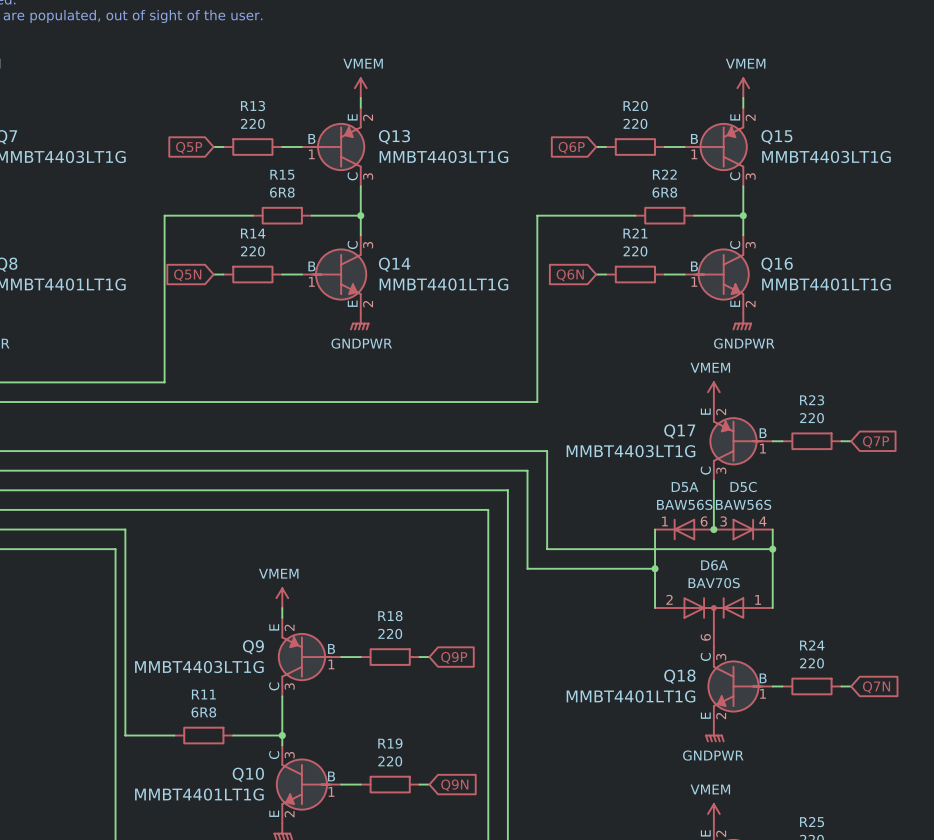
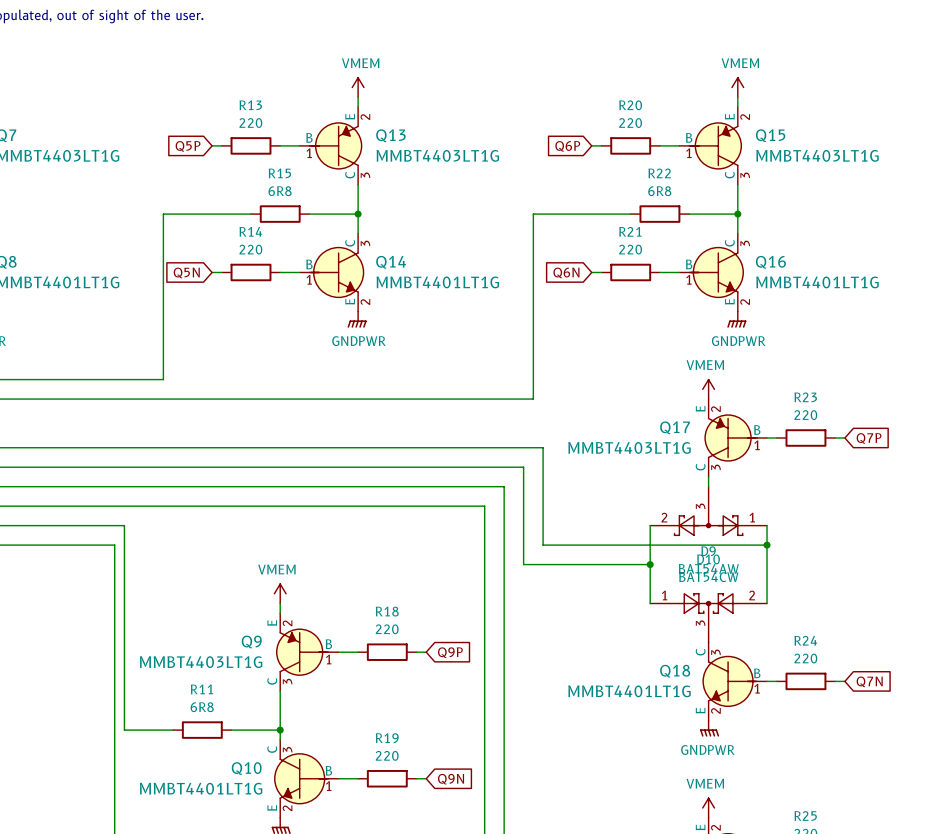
D9: none -> BAT54AW (708, 511)
D5A: BAW56S (684, 529) -> none
junction: (713, 529) -> none
D5C: BAW56S (743, 529) -> none
D6A: BAV70S (713, 622) -> none
D10: none -> BAT54CW (708, 618)

